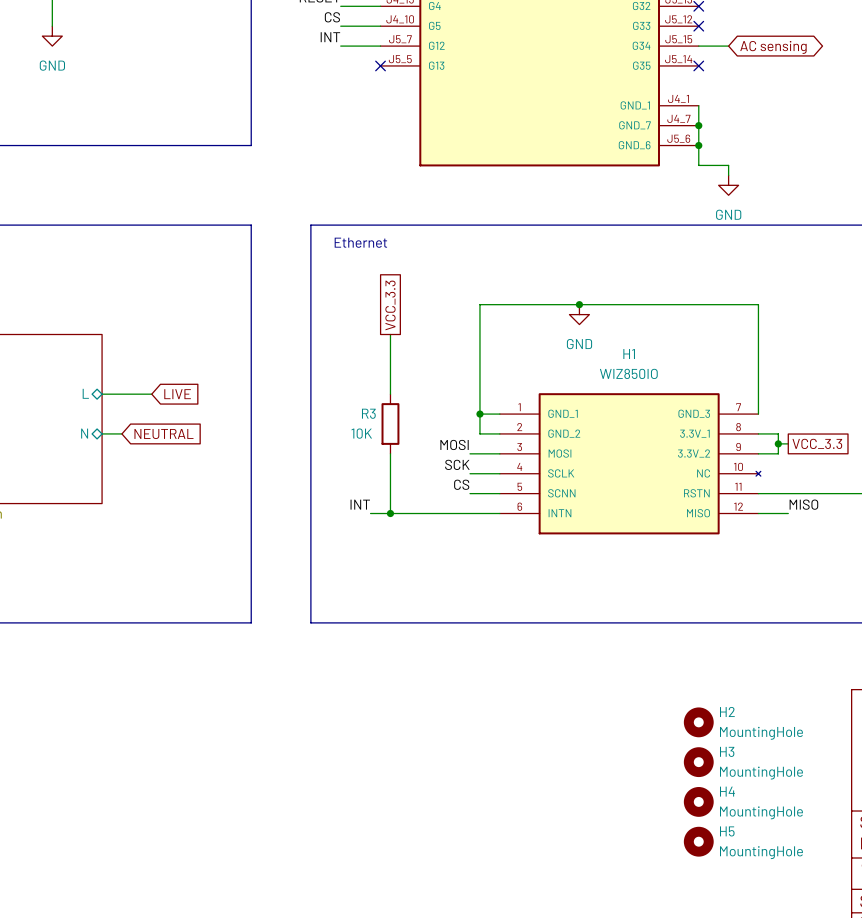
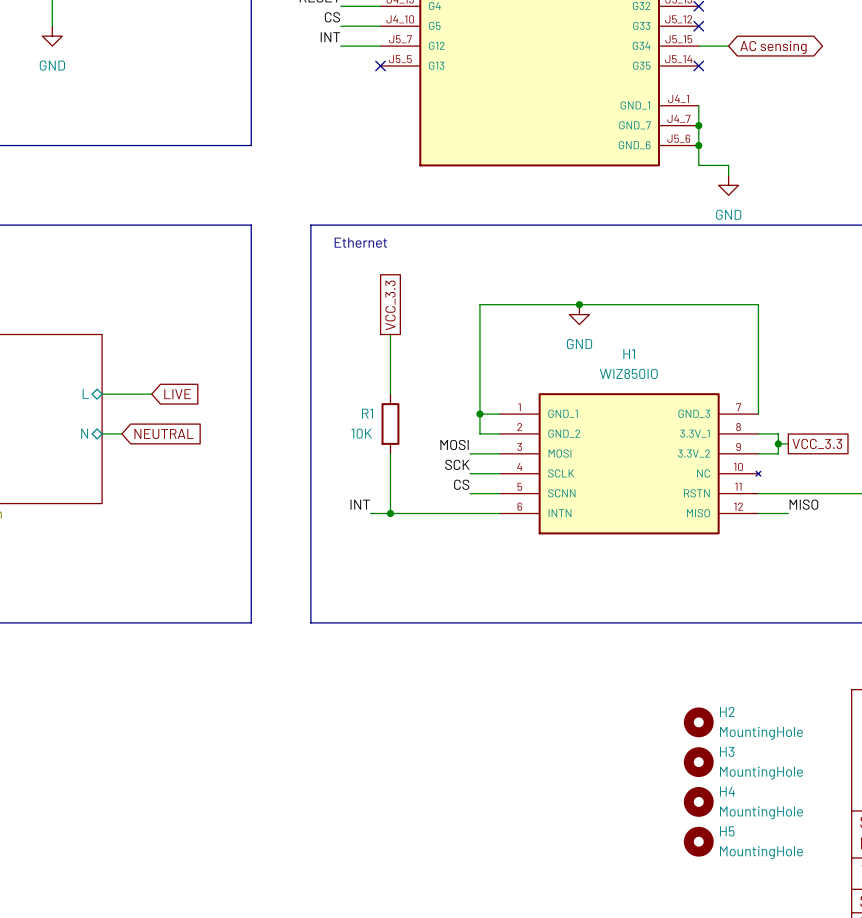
R3 name: R3 (368, 413) -> R1 (367, 413)

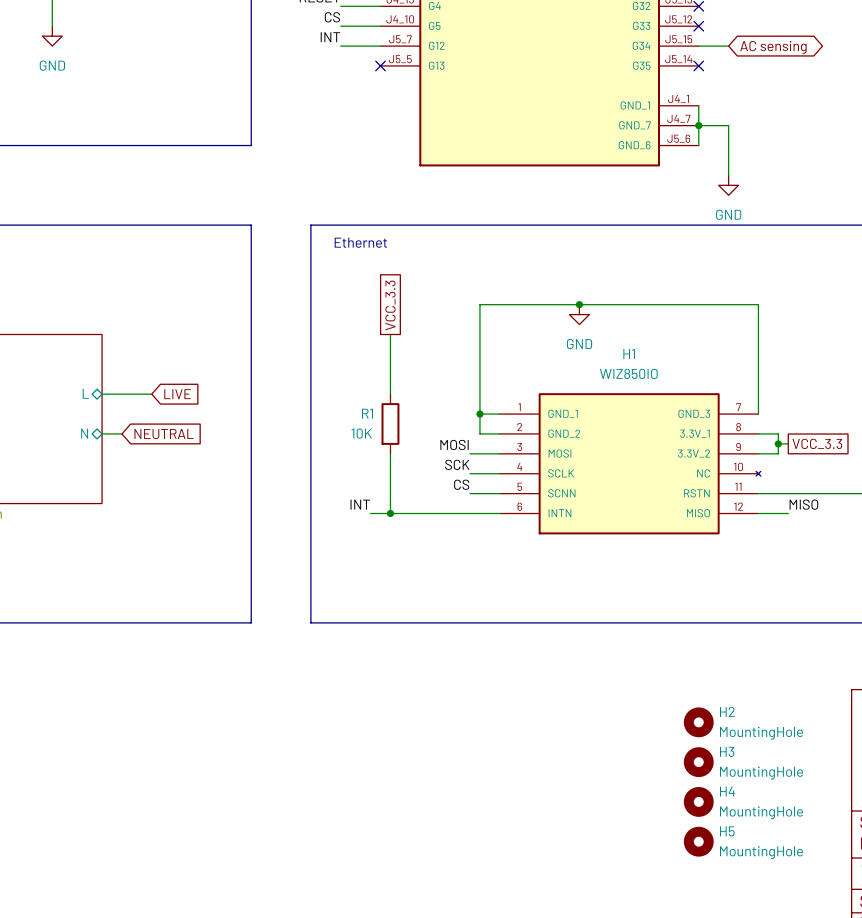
wire: (698, 145) (698, 165) (728, 165) -> (698, 125) (728, 125) (728, 165)
junction: (698, 145) -> none

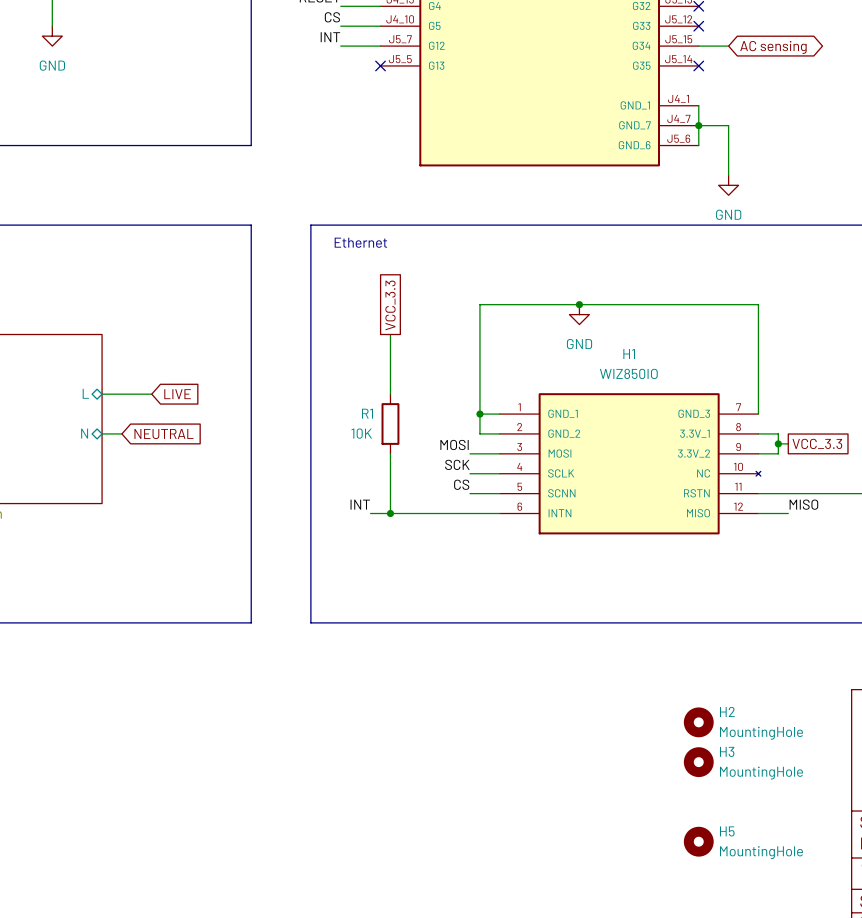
H4: MountingHole (698, 801) -> none

